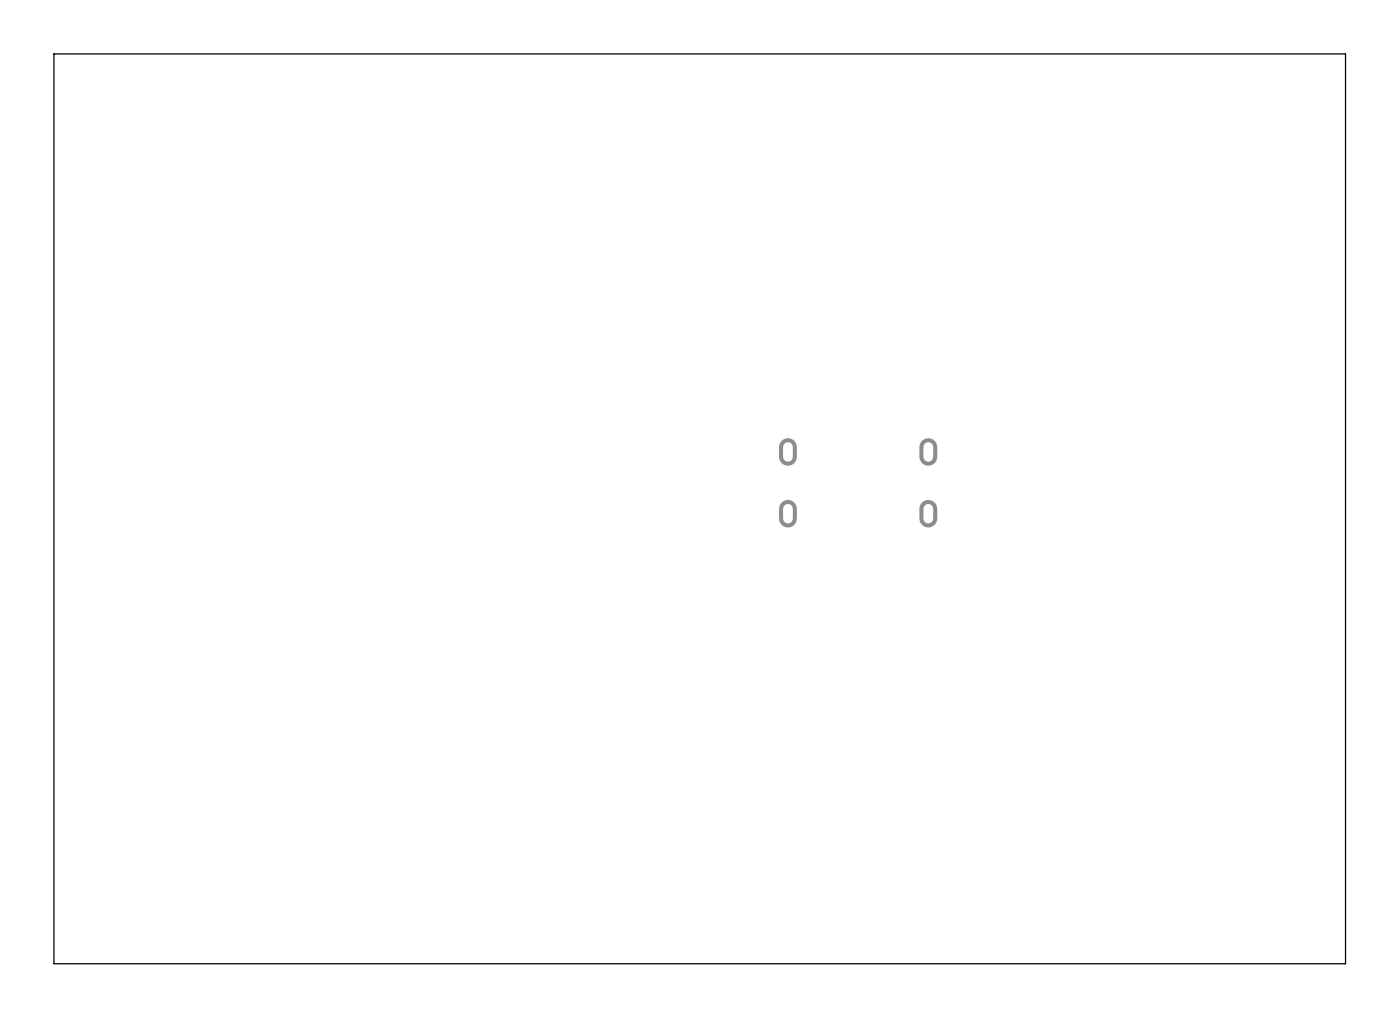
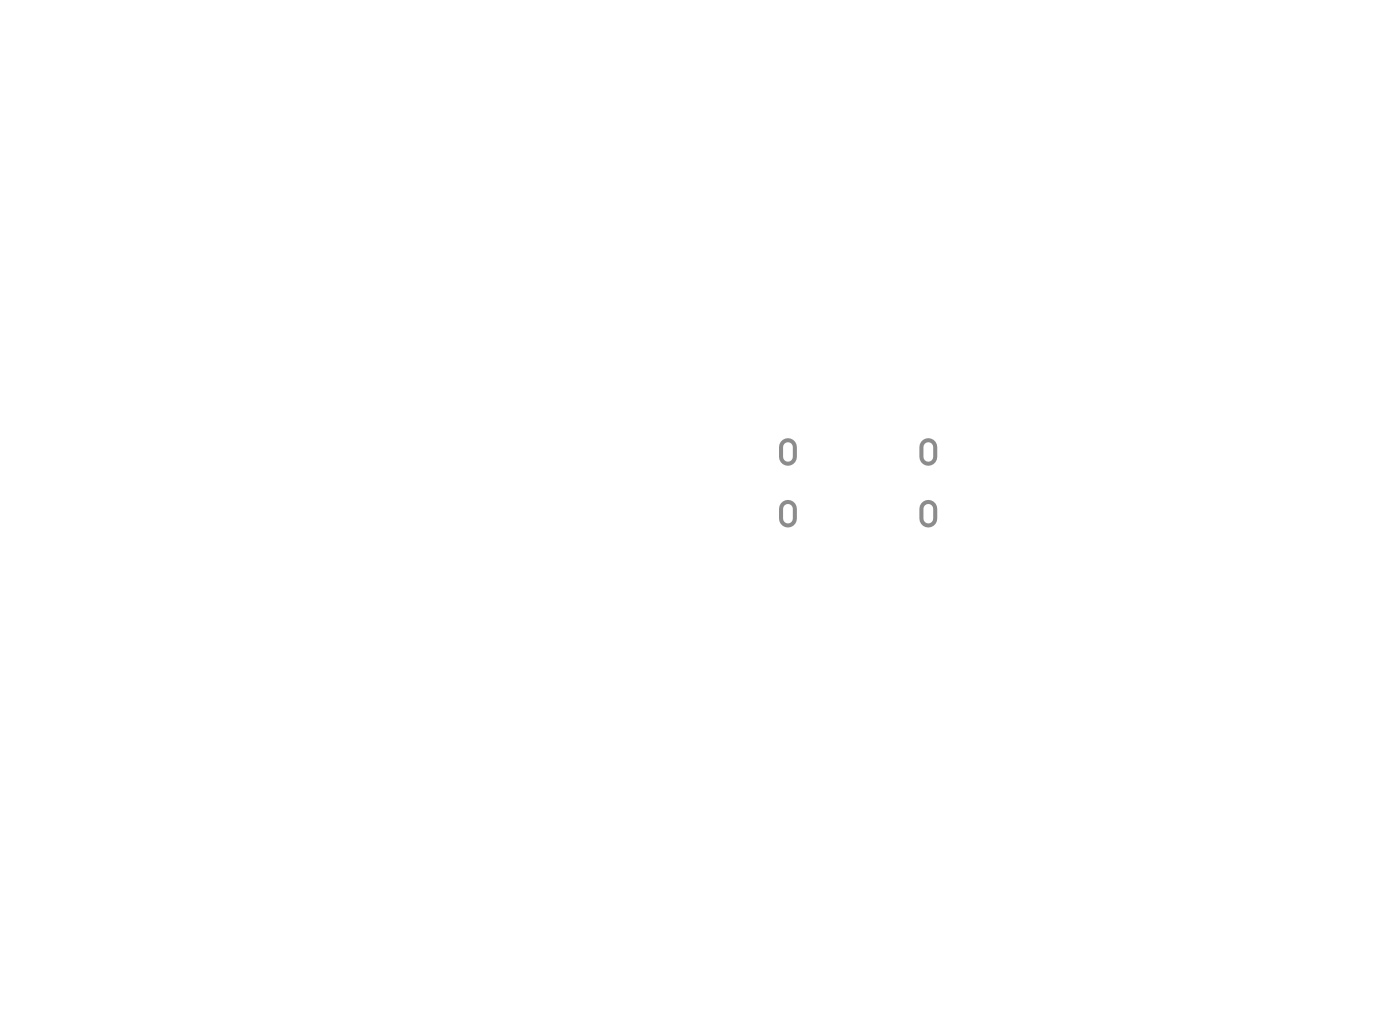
board edge: (1345, 53) (1345, 963) (53, 963) (53, 53) (1345, 53) -> none

